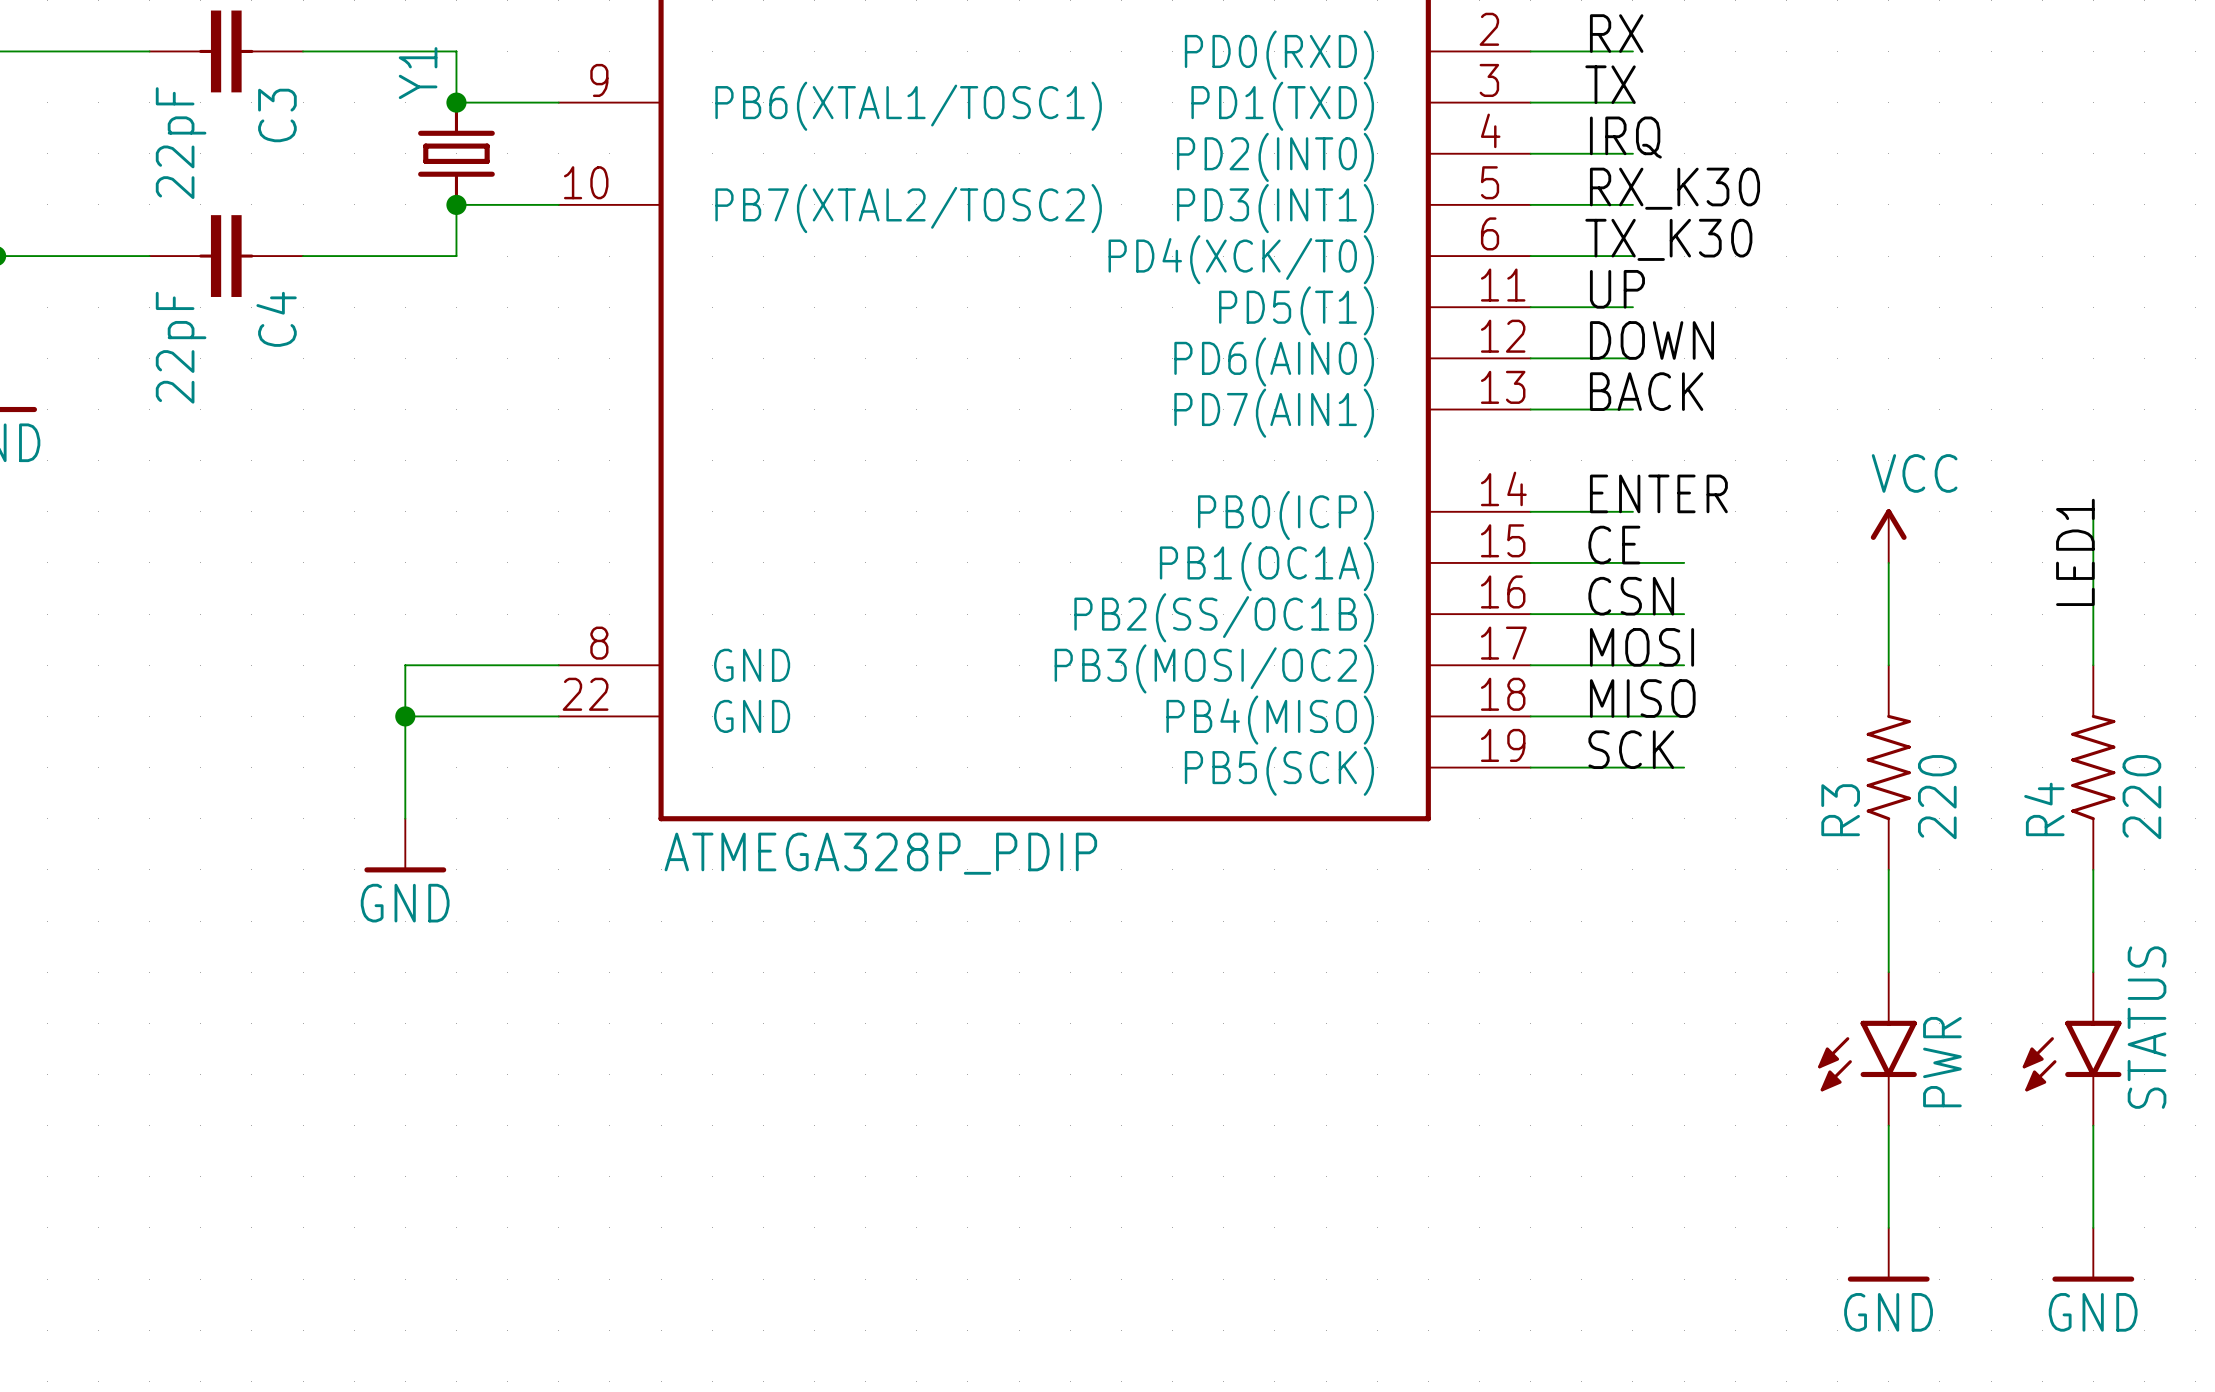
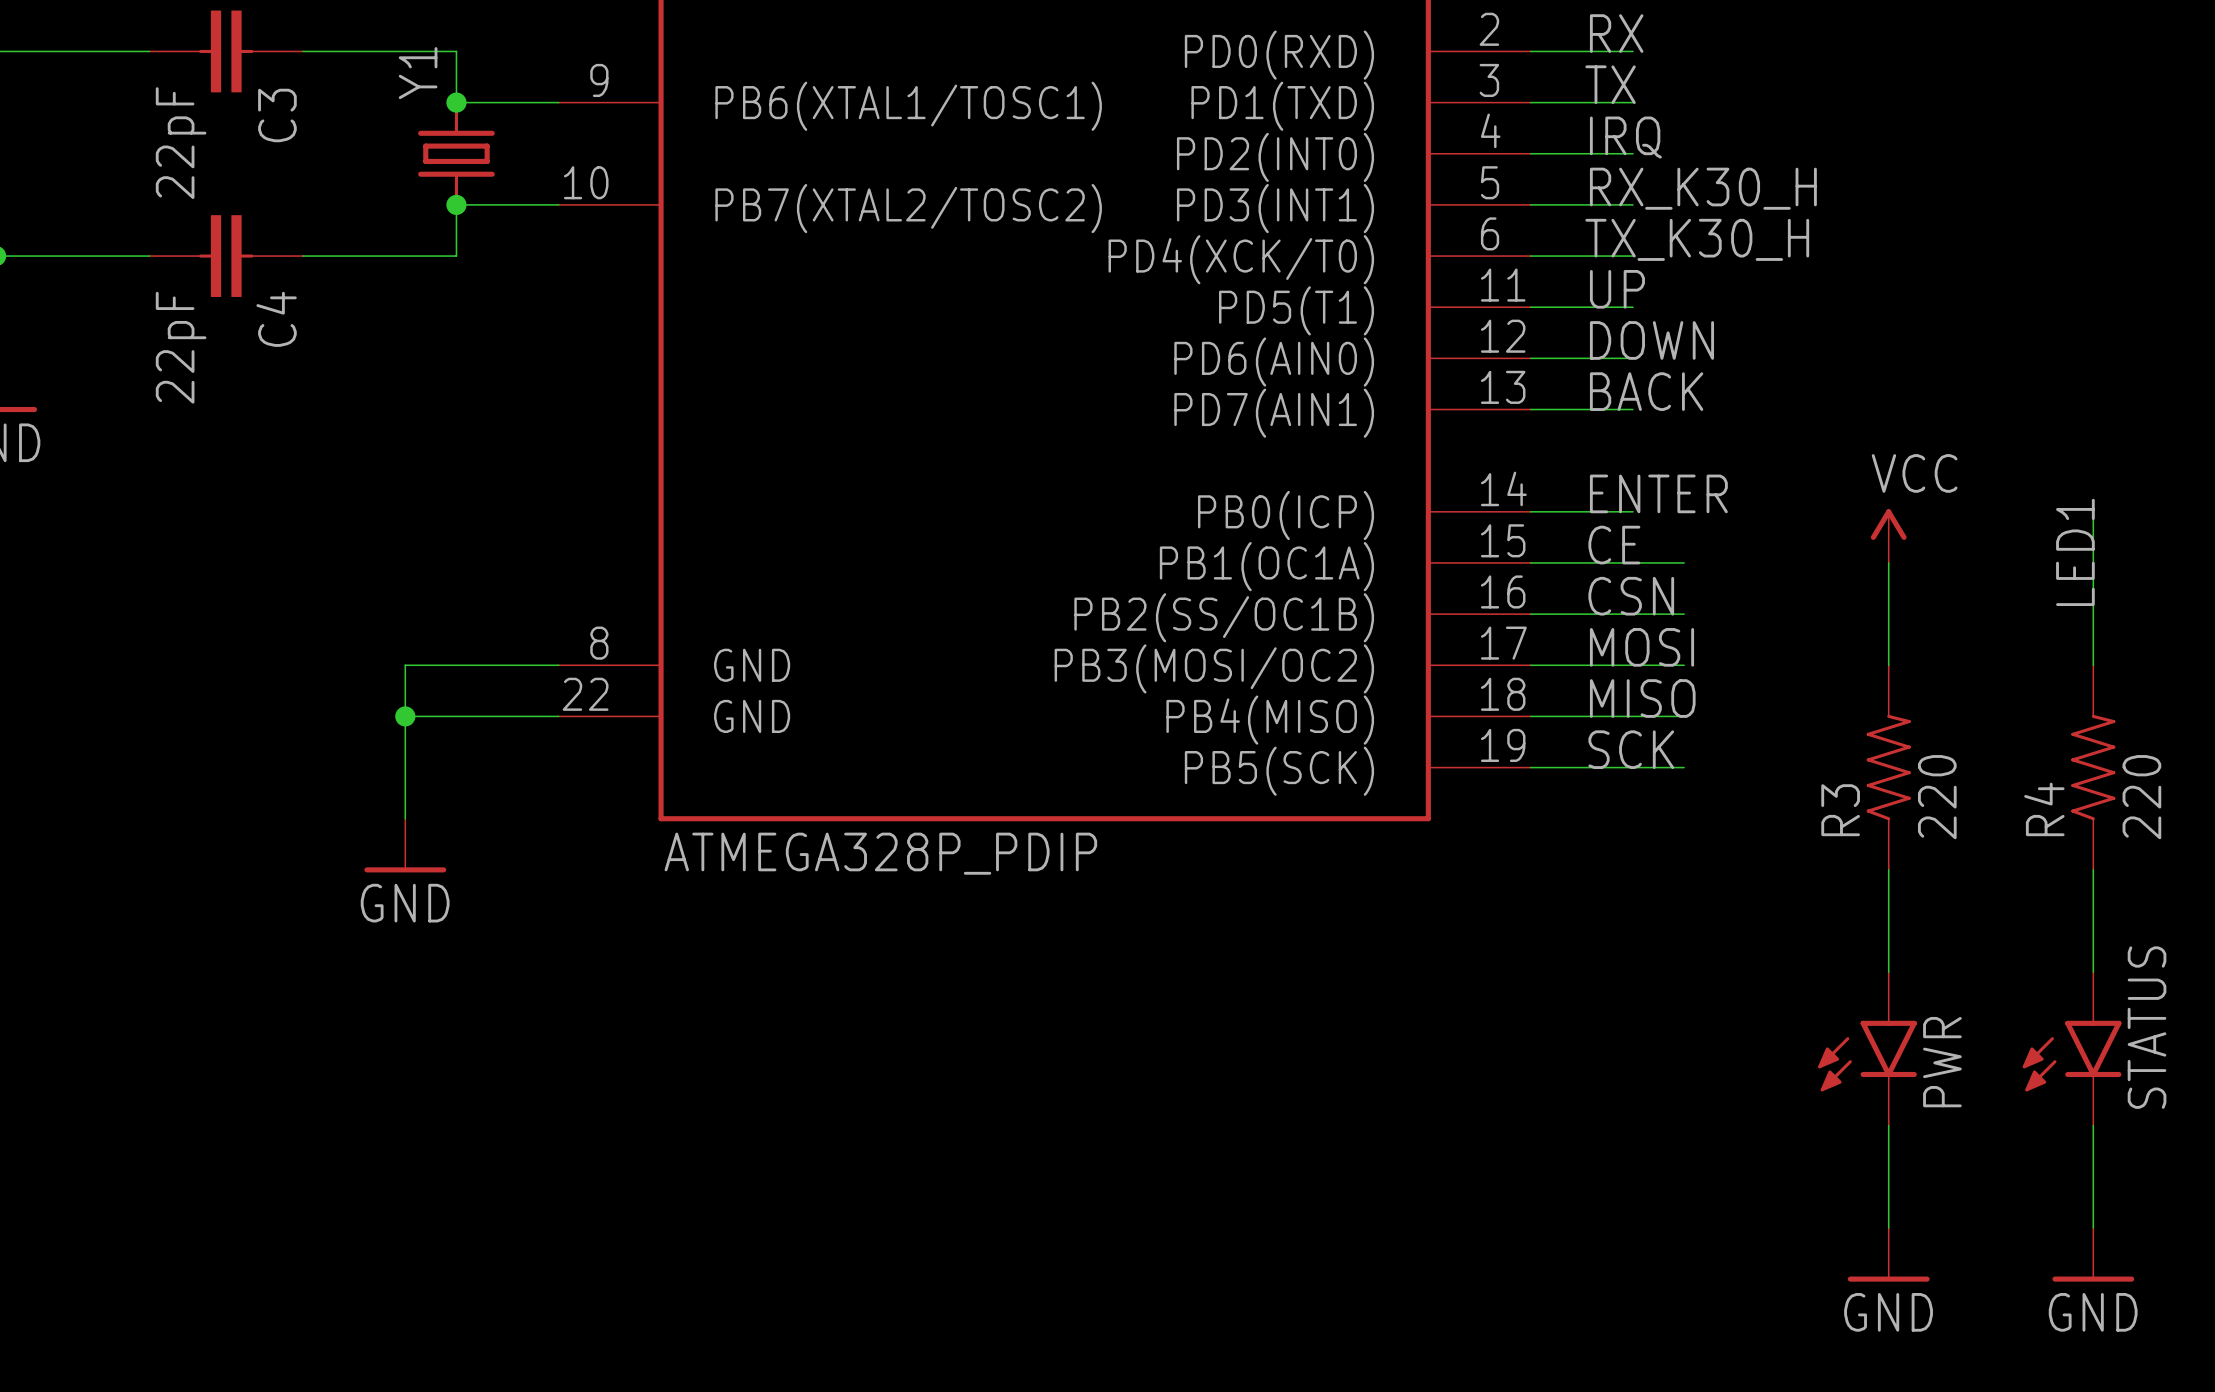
label: RX_K30 (1674, 188) -> RX_K30_H (1703, 188)
label: TX_K30 (1668, 239) -> TX_K30_H (1697, 239)

